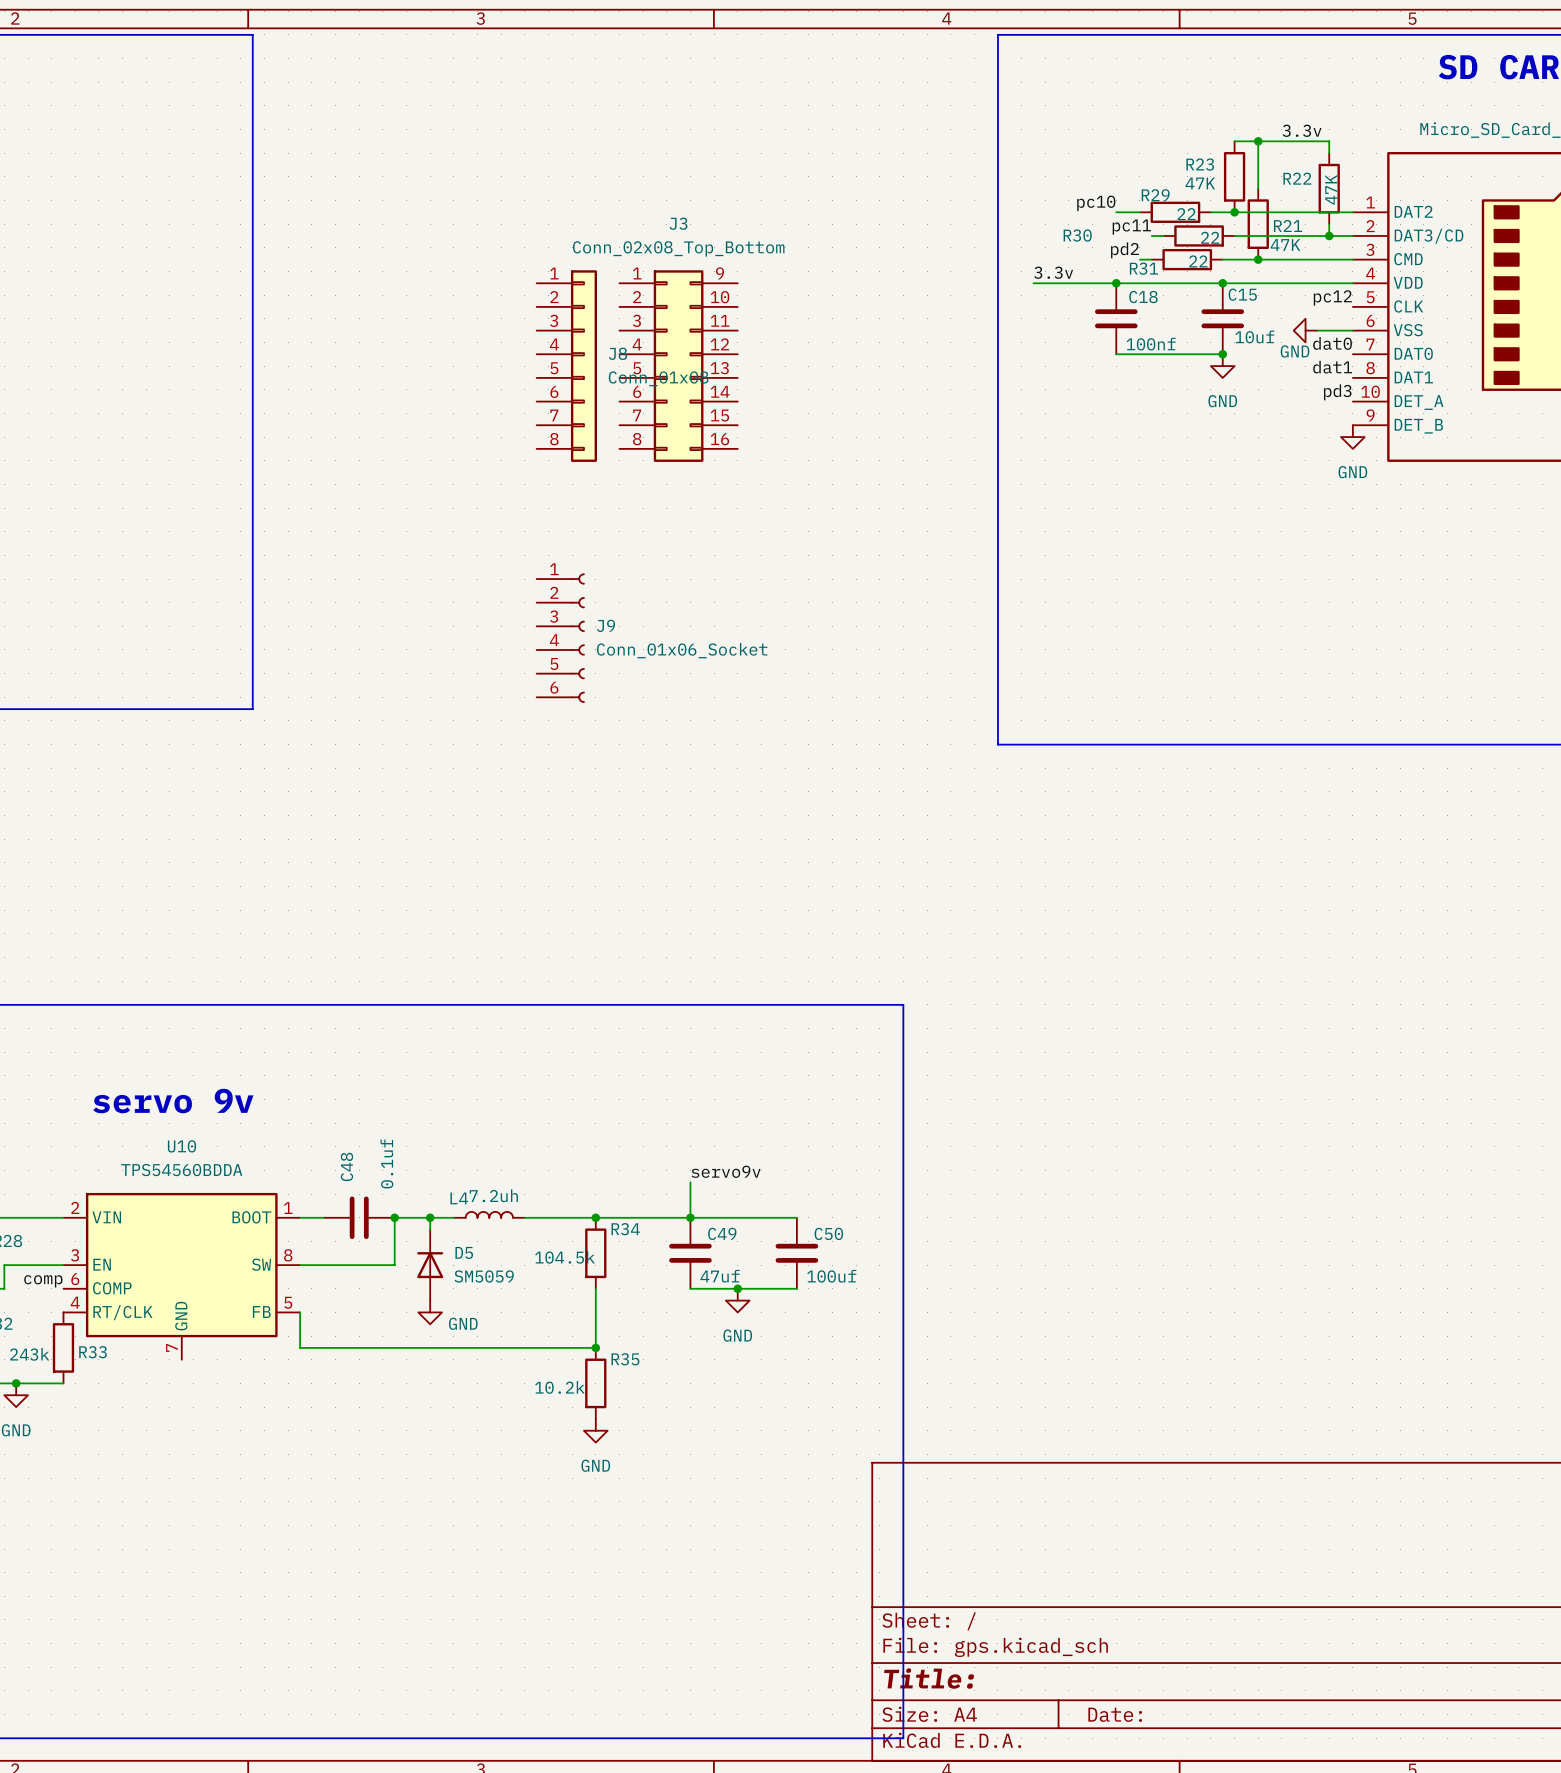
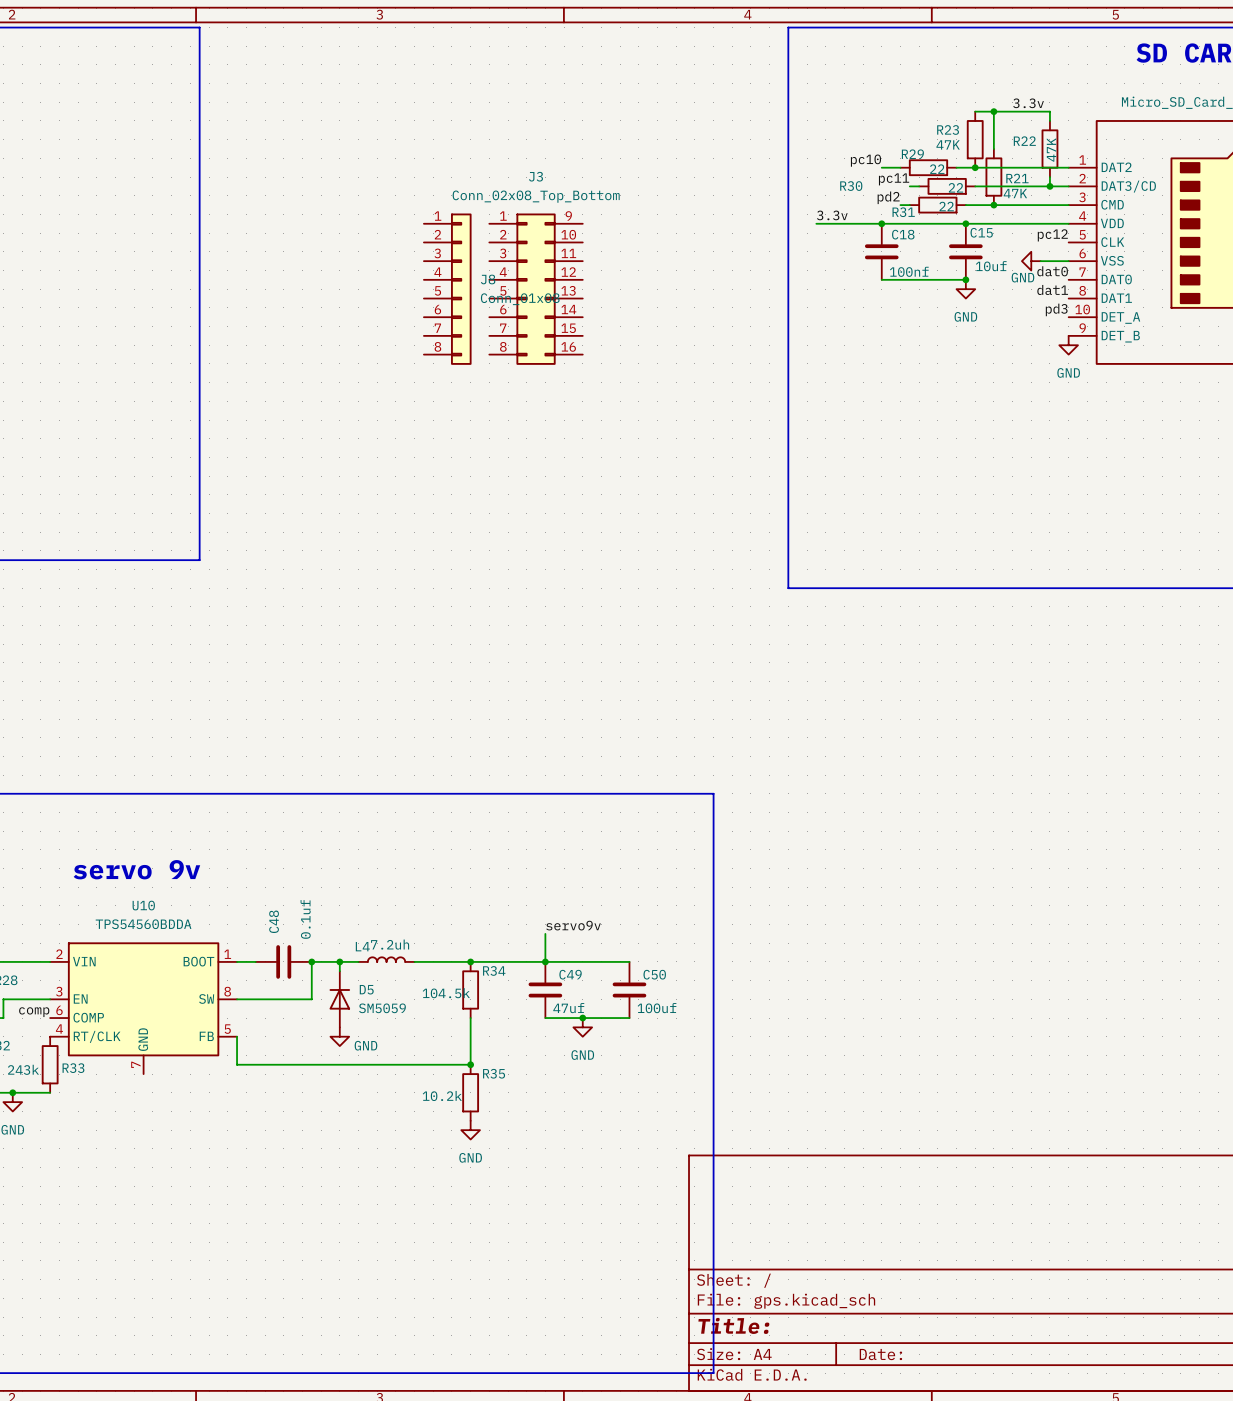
J9: Conn_01x06_Socket (560, 638) -> none

